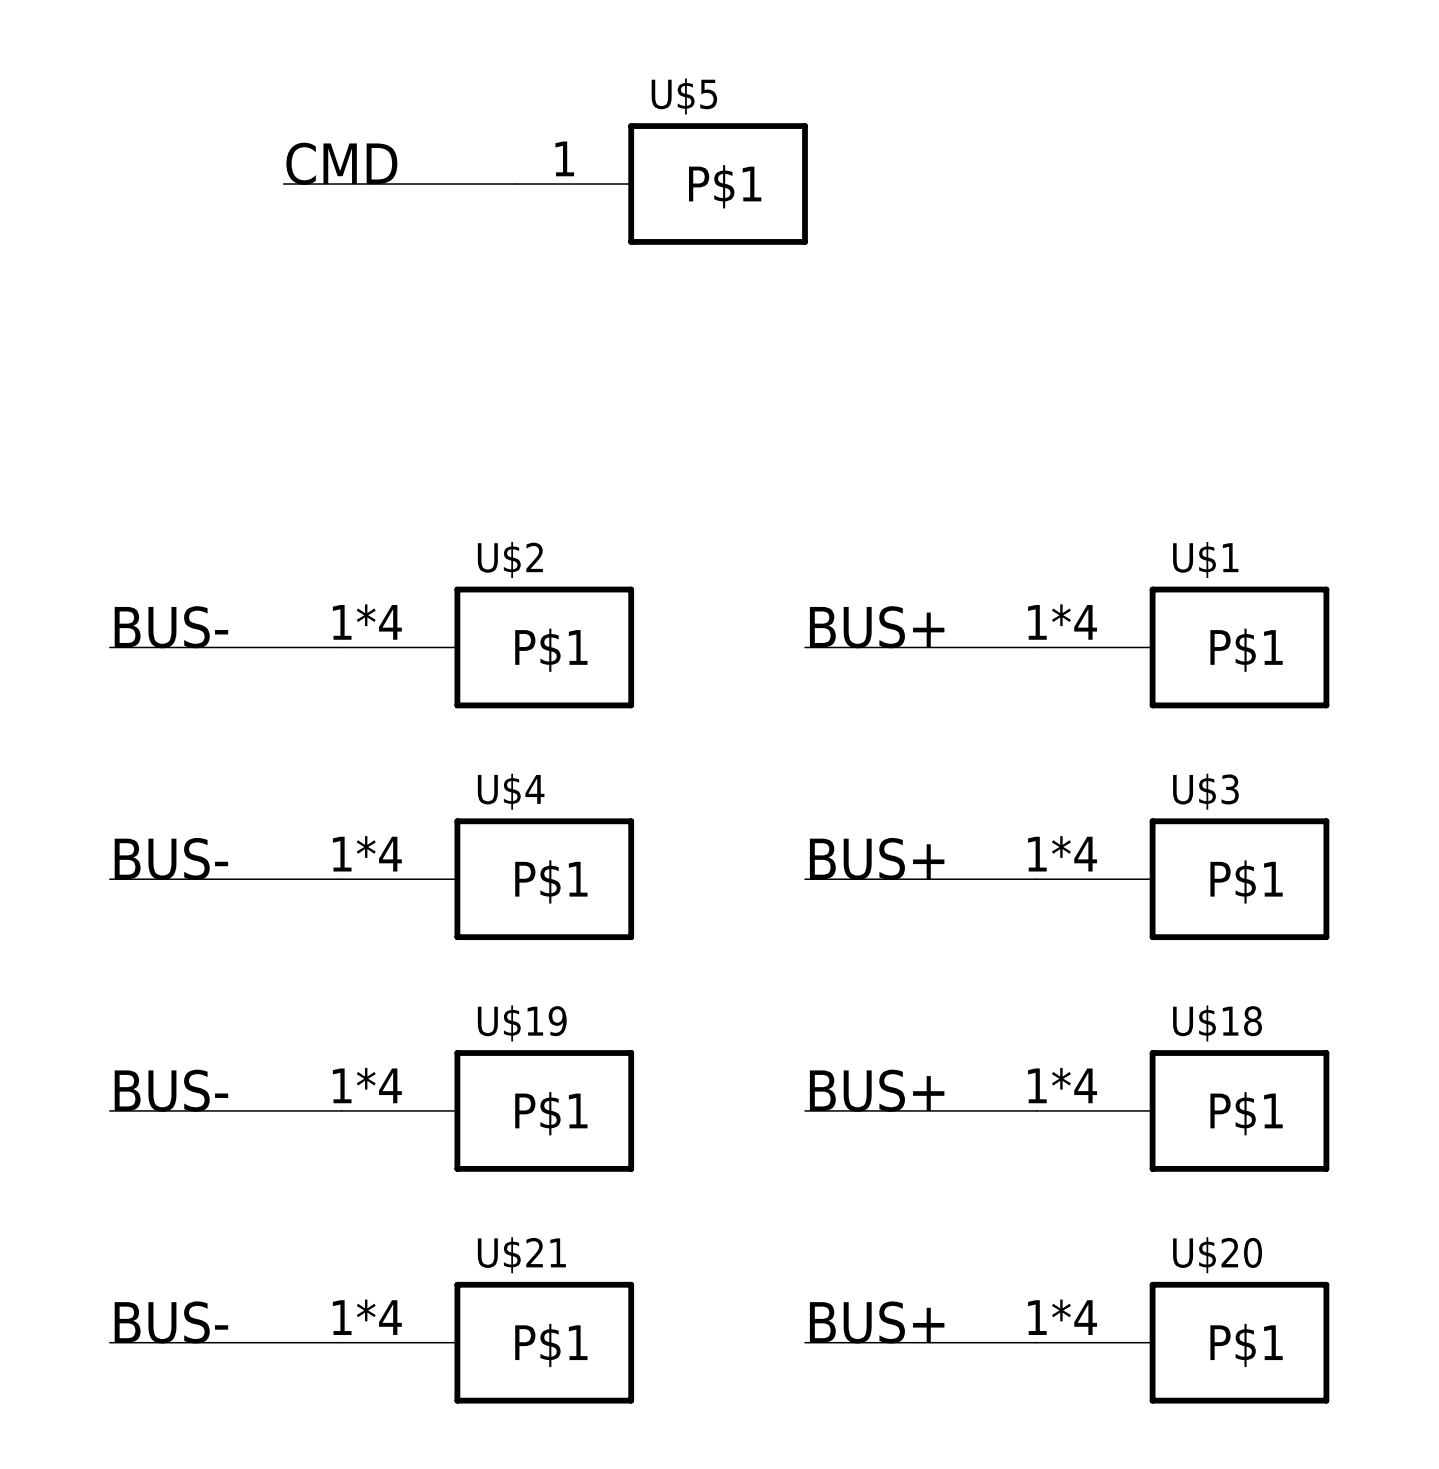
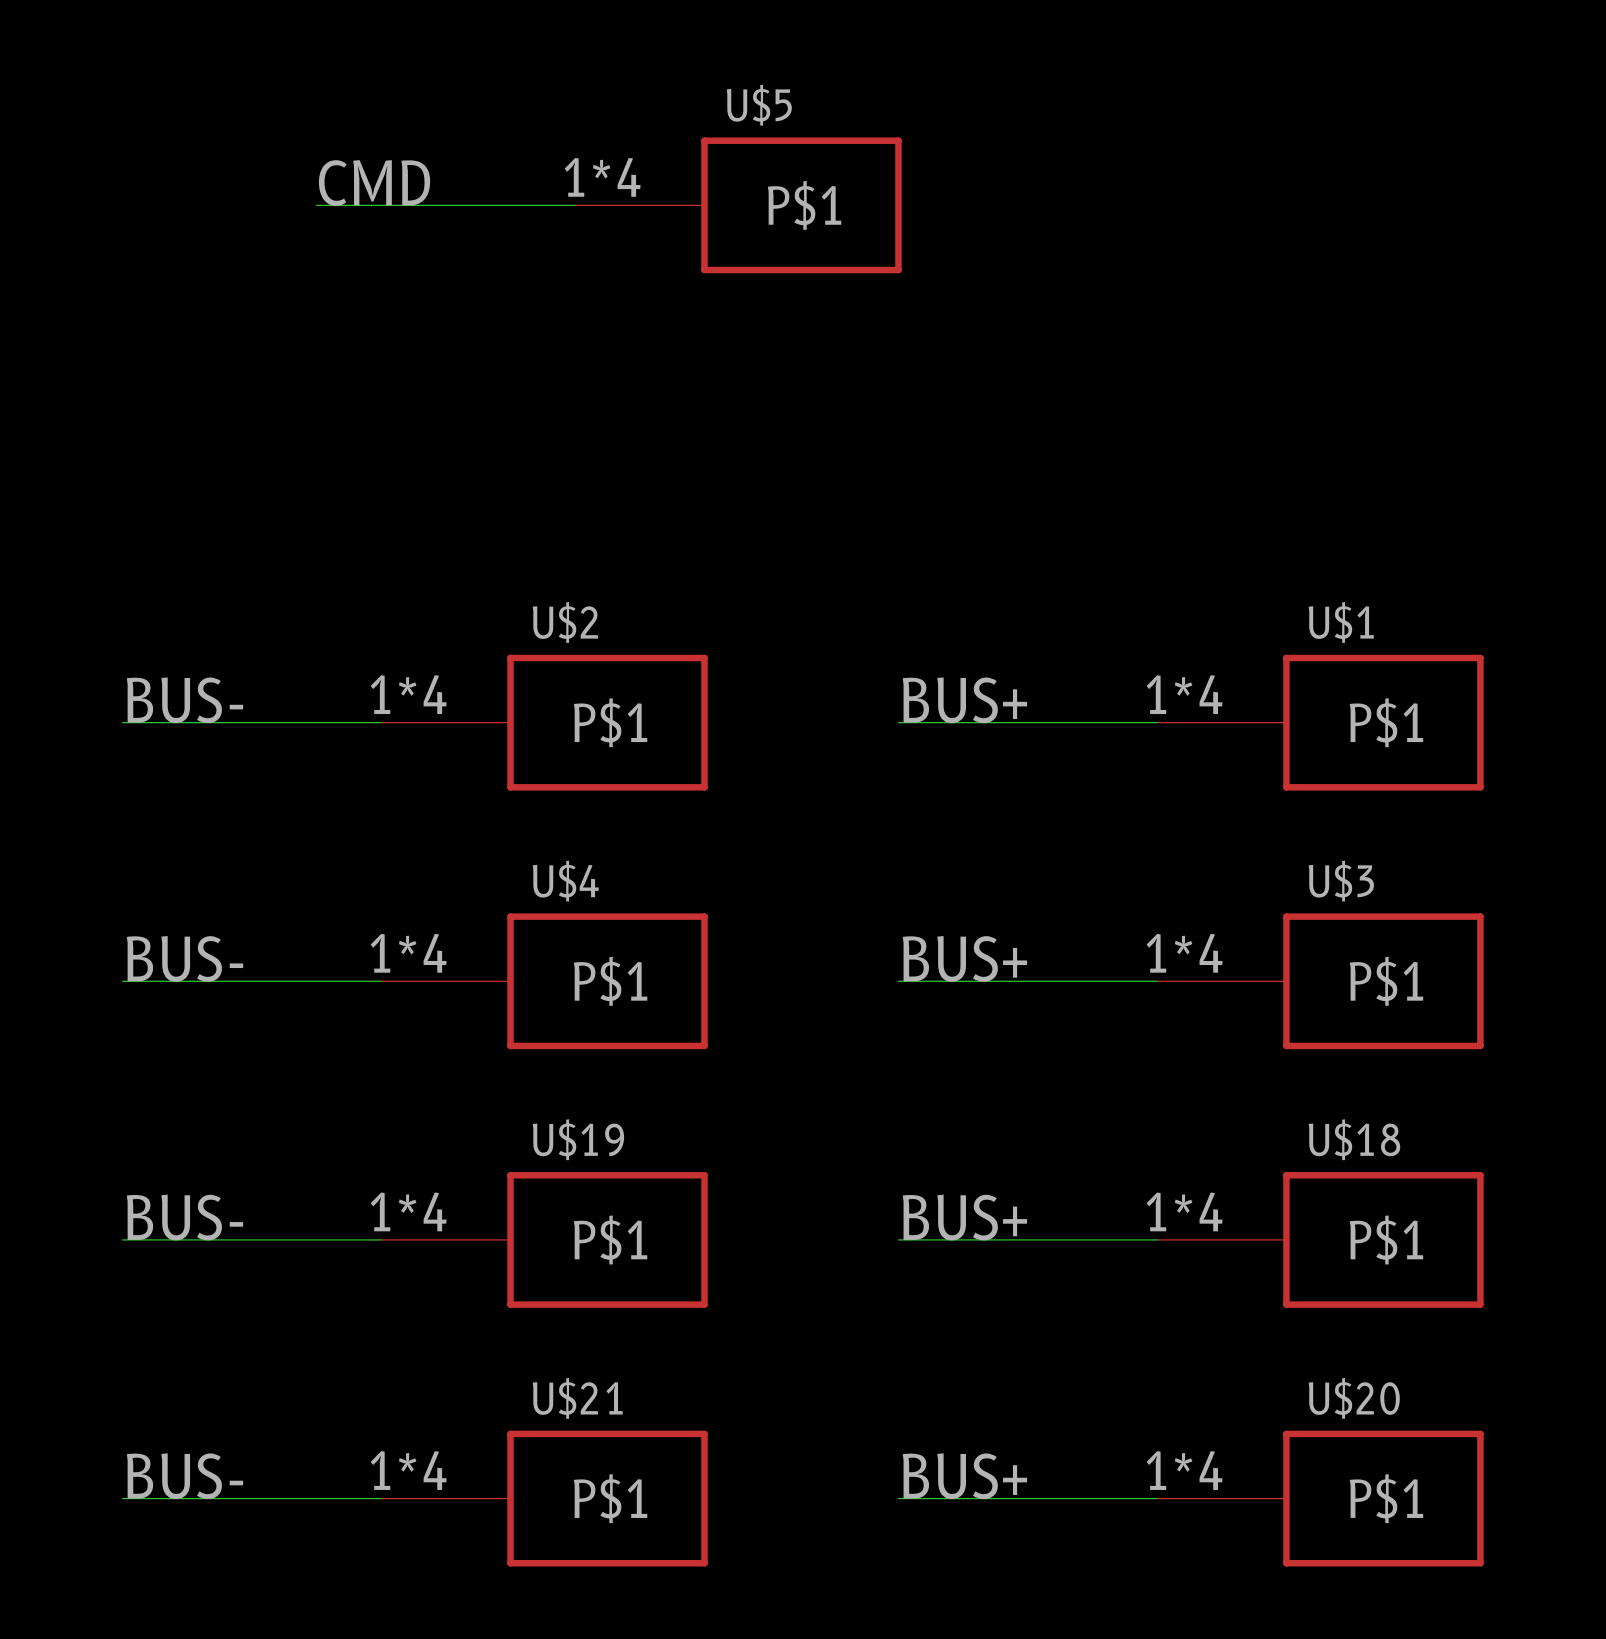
U$5 pin number: 1 (564, 158) -> 1*4 (602, 177)

